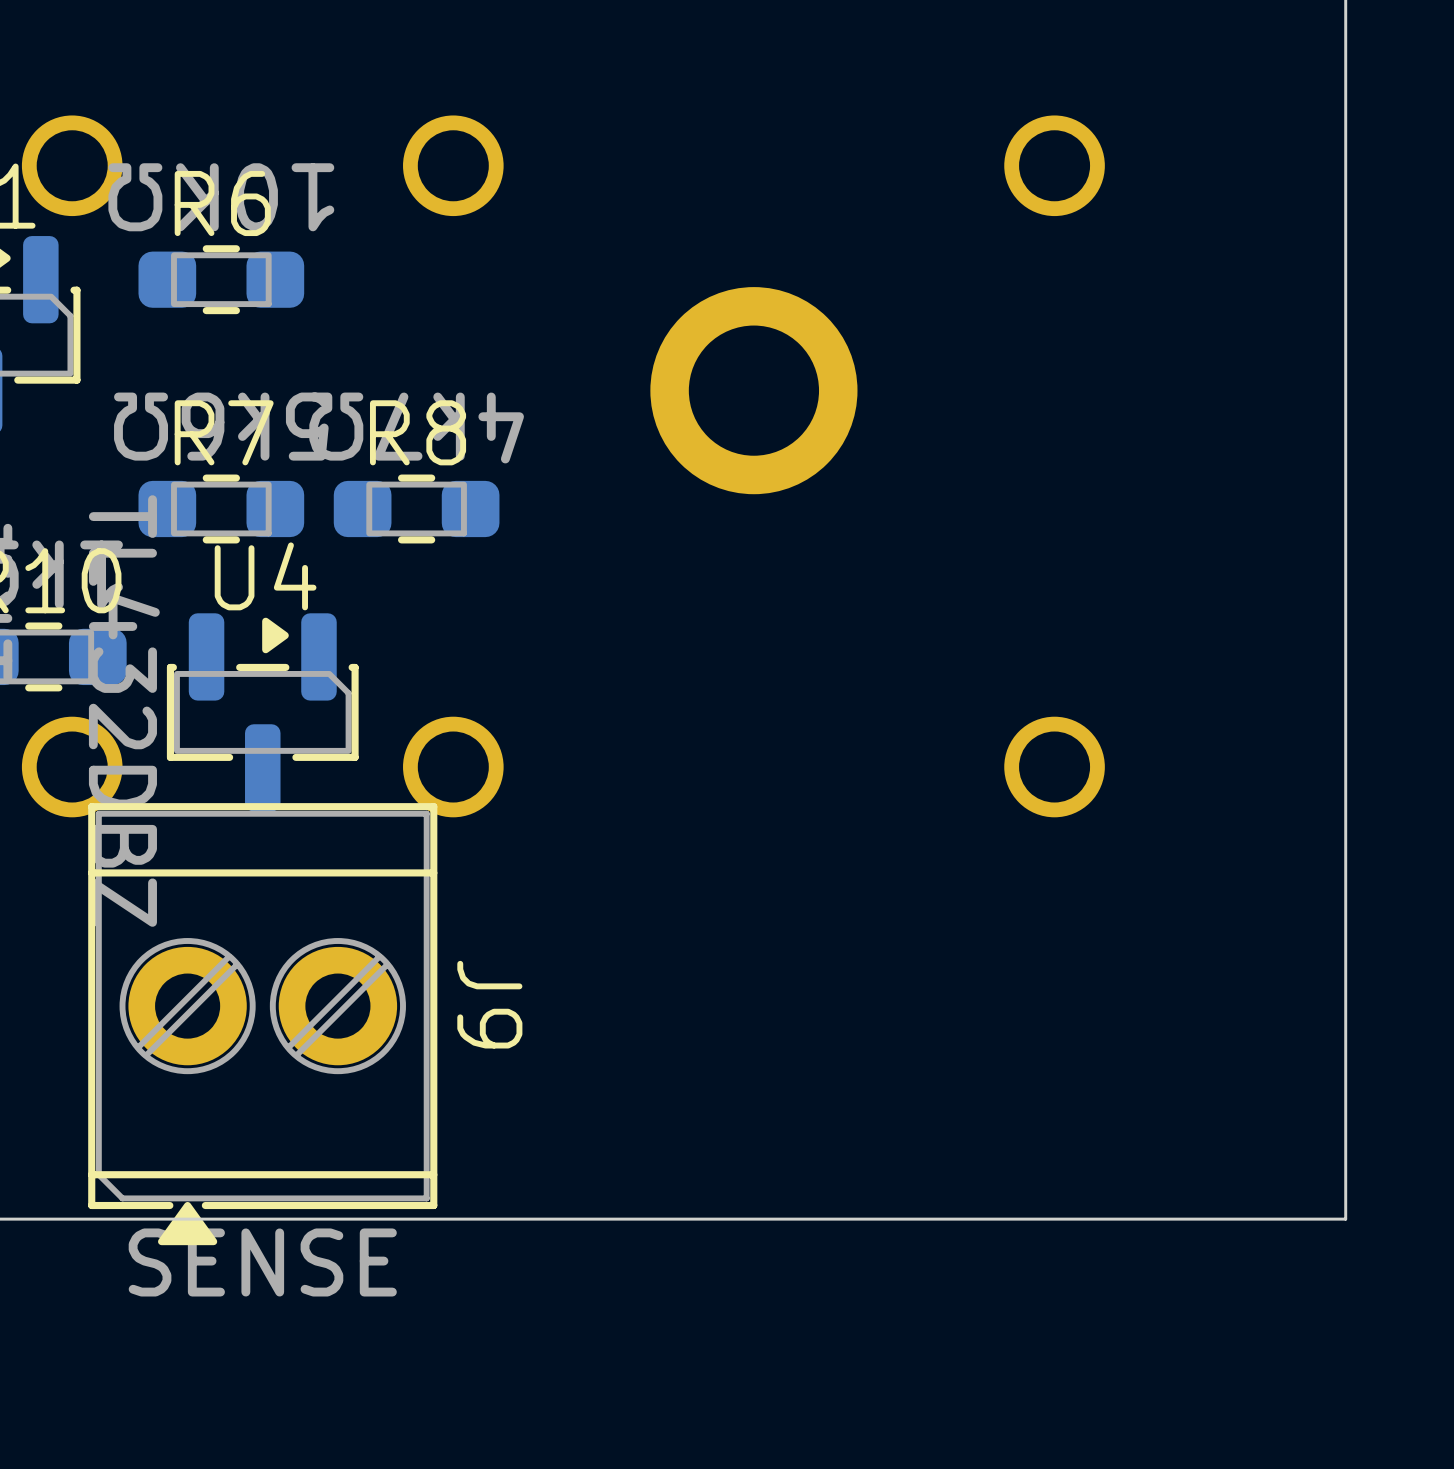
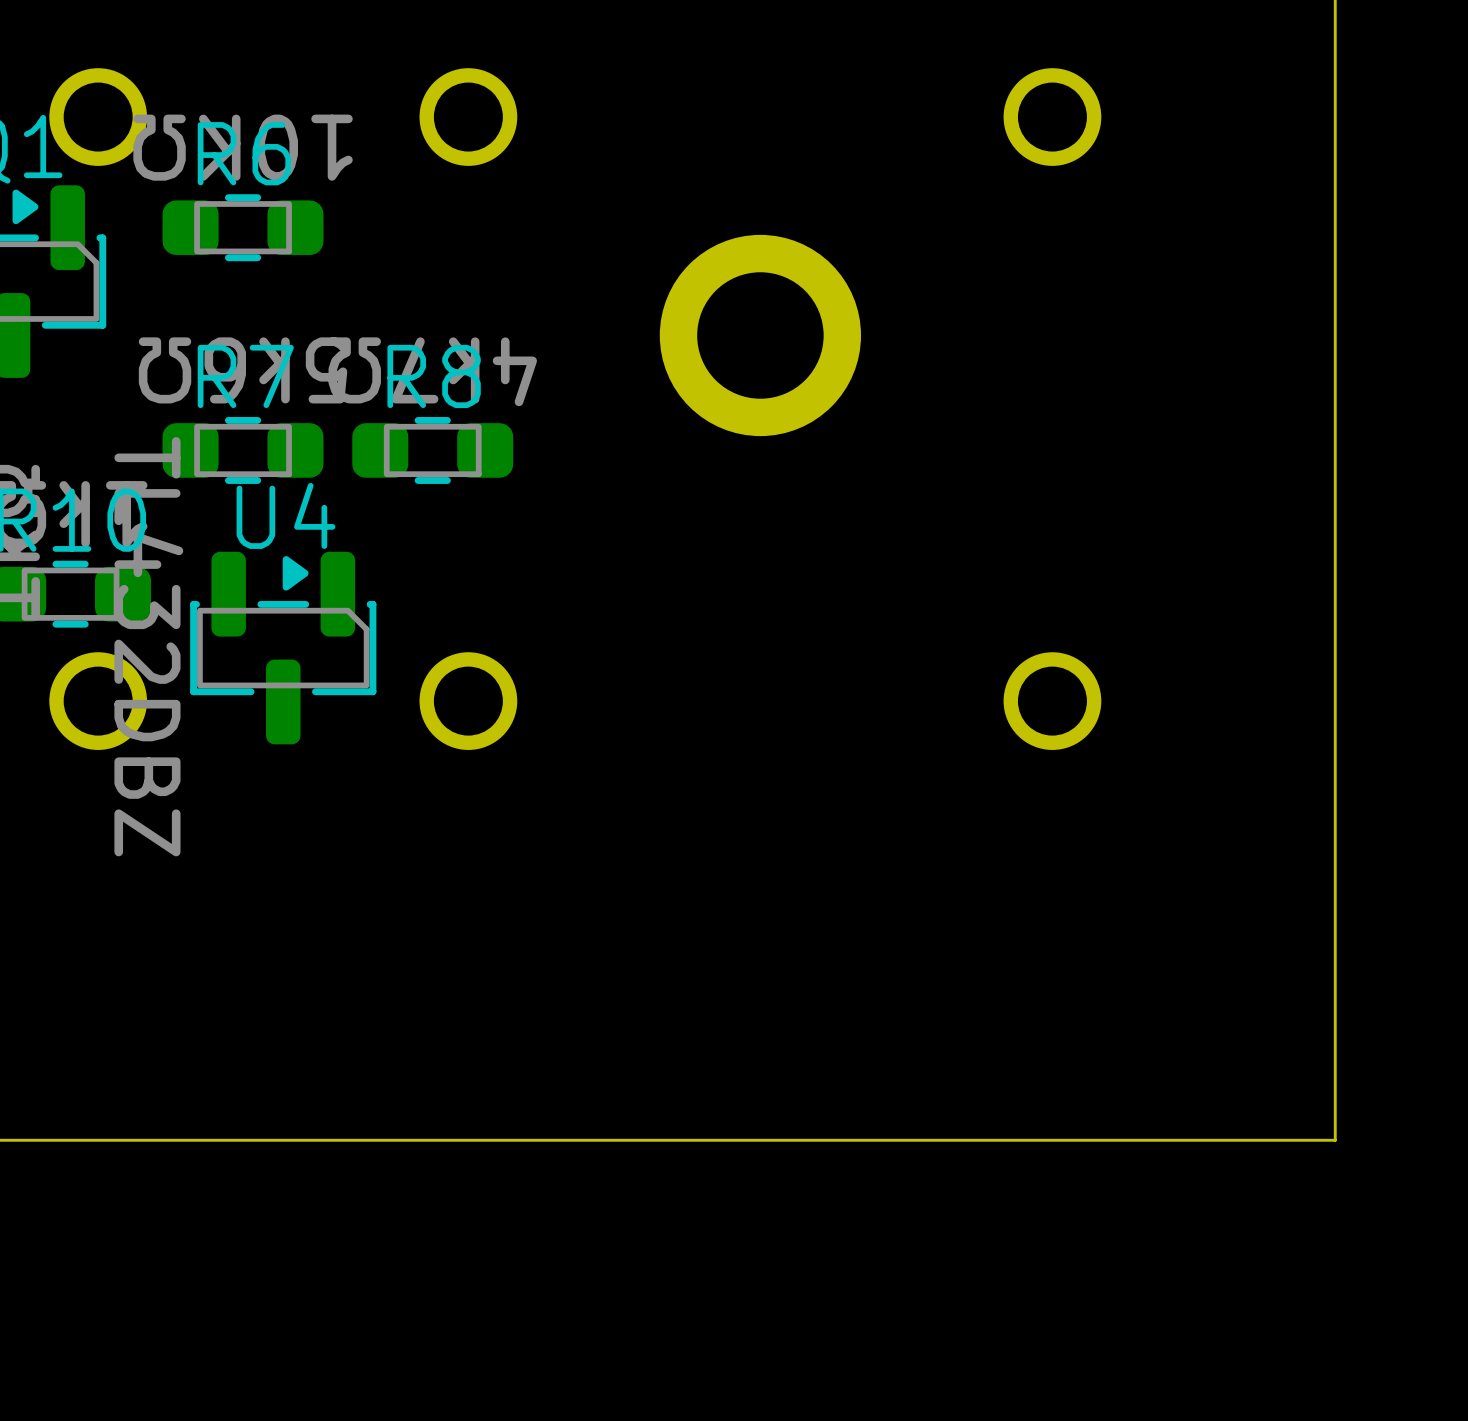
J9: SENSE (262, 1024) -> none

